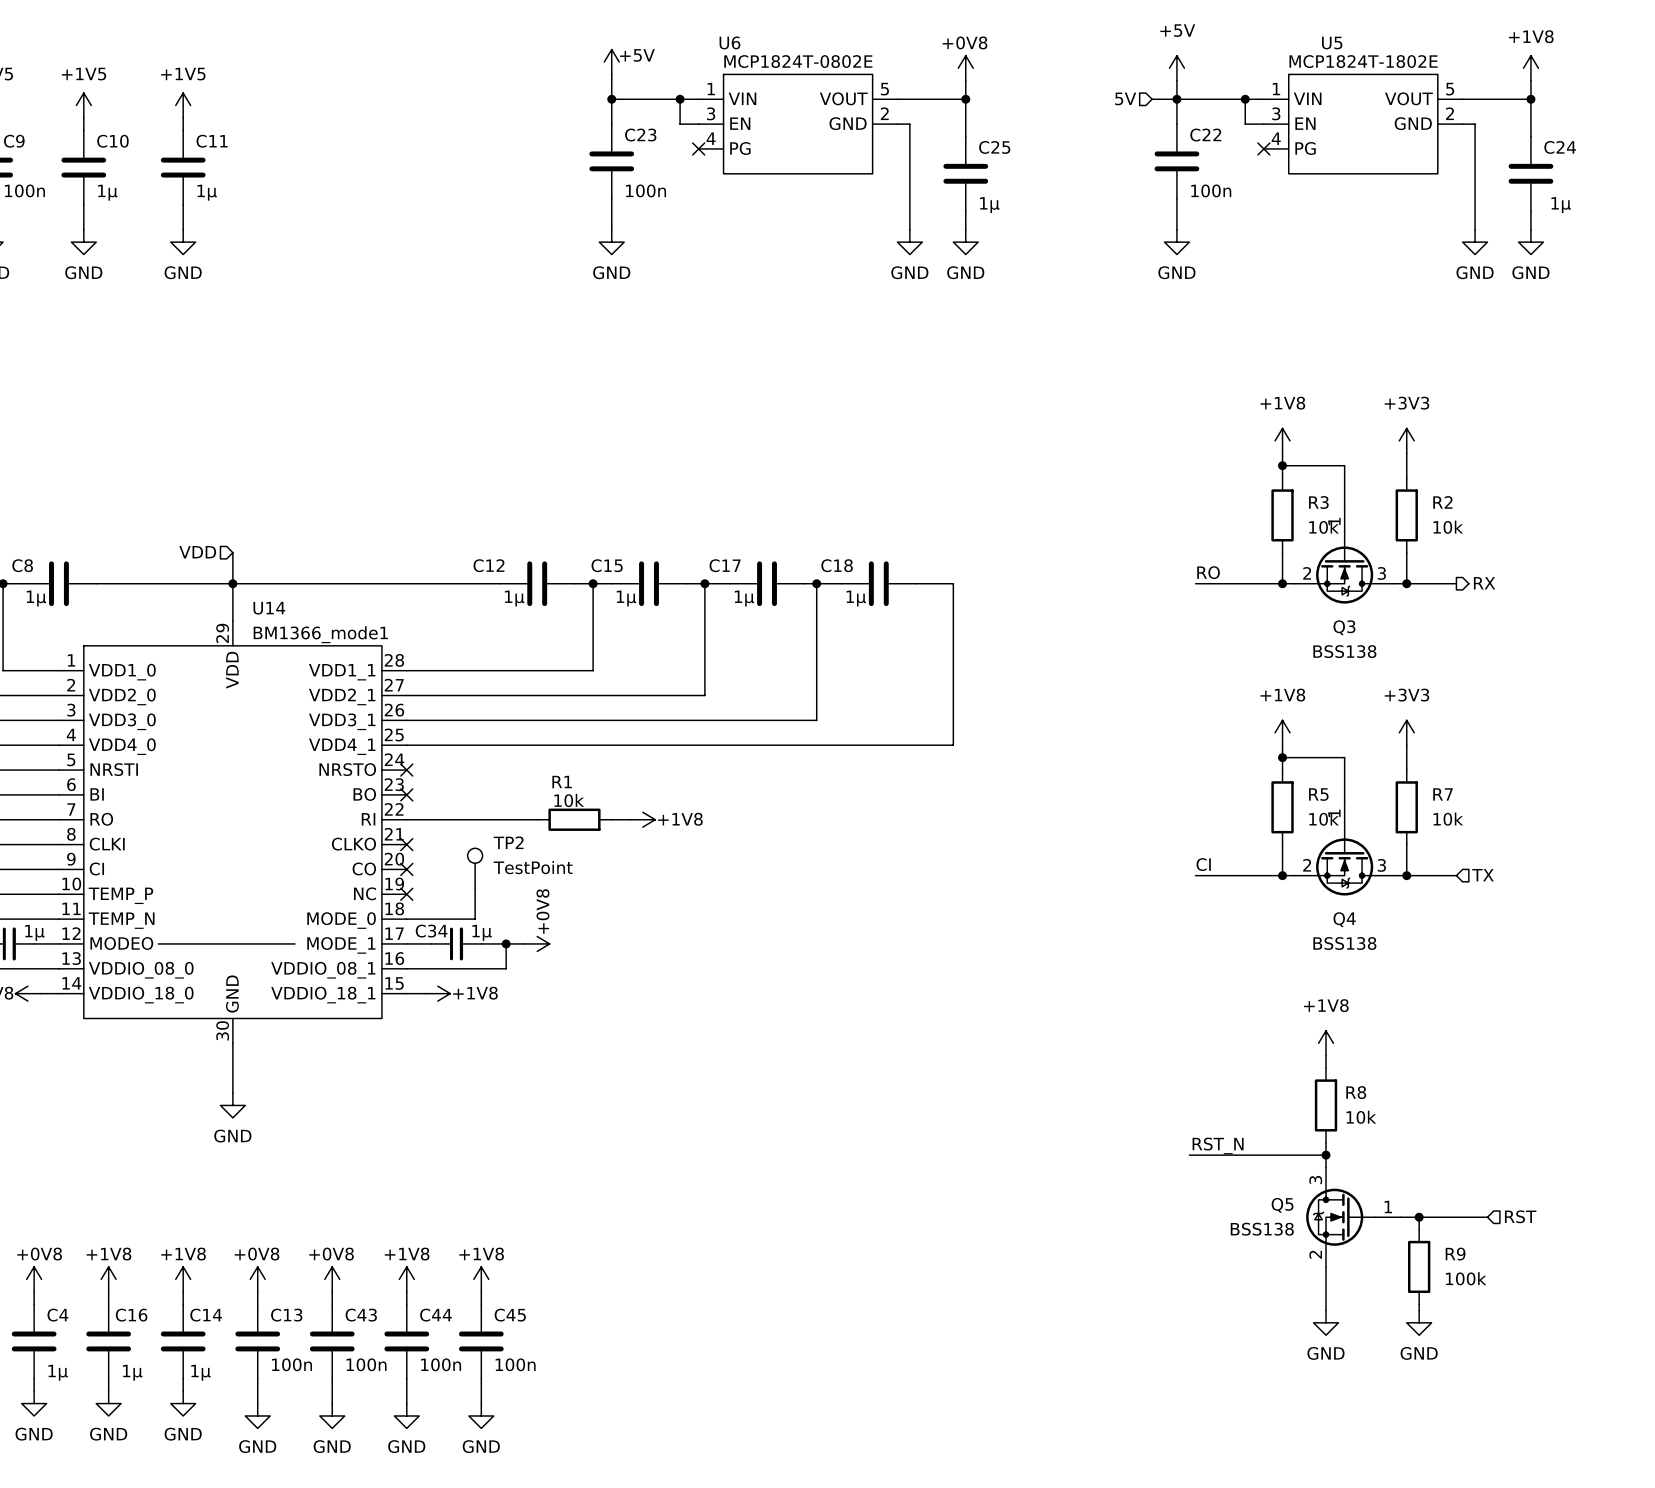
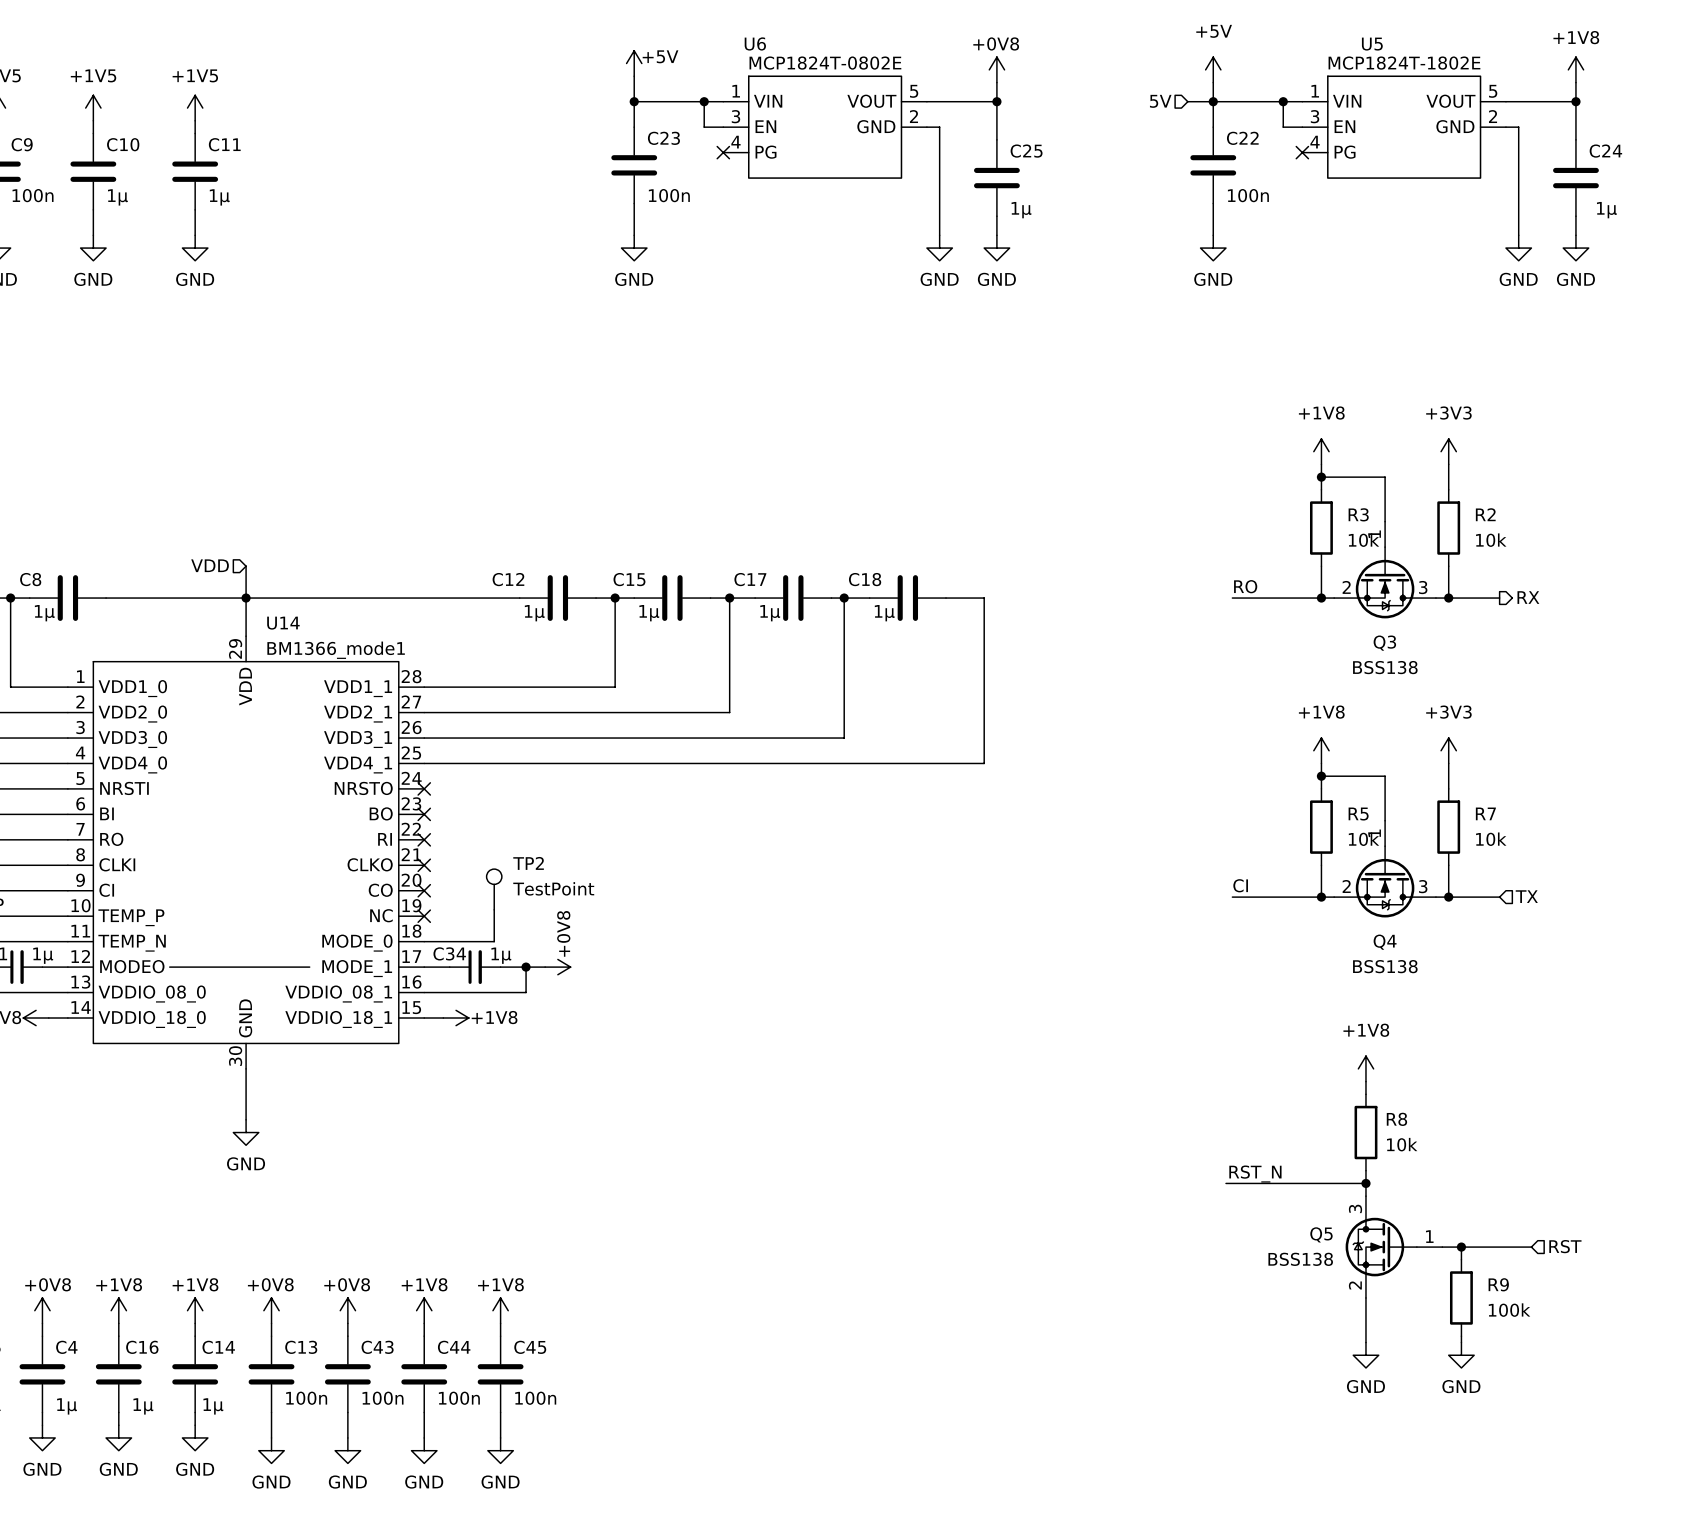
wire: (406, 819) (537, 819) -> none
no-connect mark: none -> (424, 839)
R1: 10k (574, 819) -> none
wire: (611, 819) (630, 819) -> none
power symbol: +1V8 (642, 819) -> none

